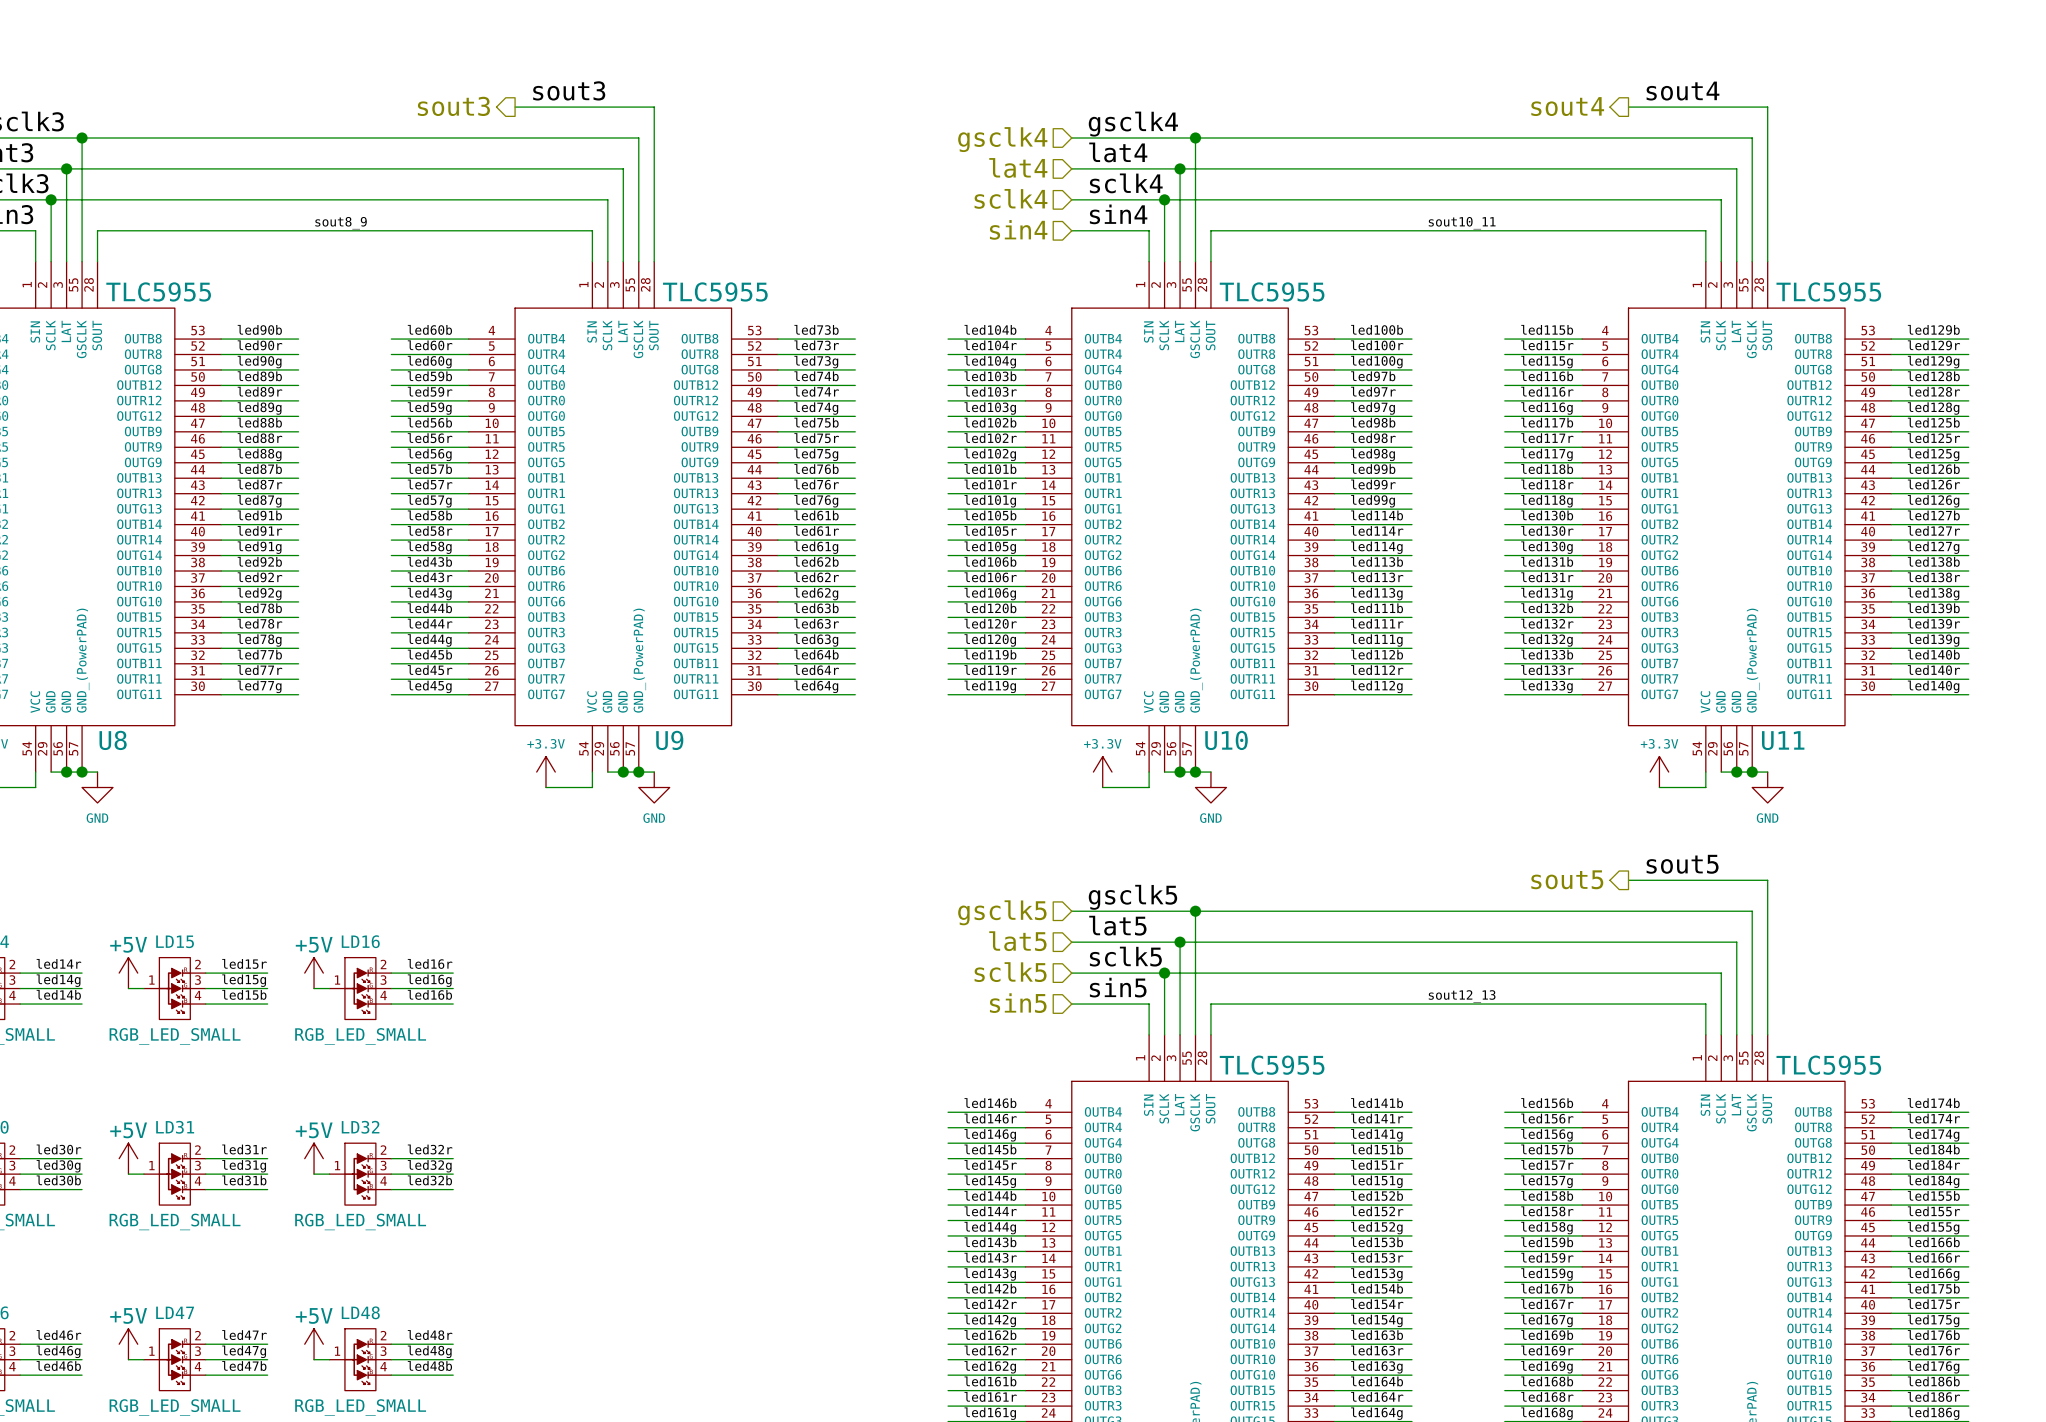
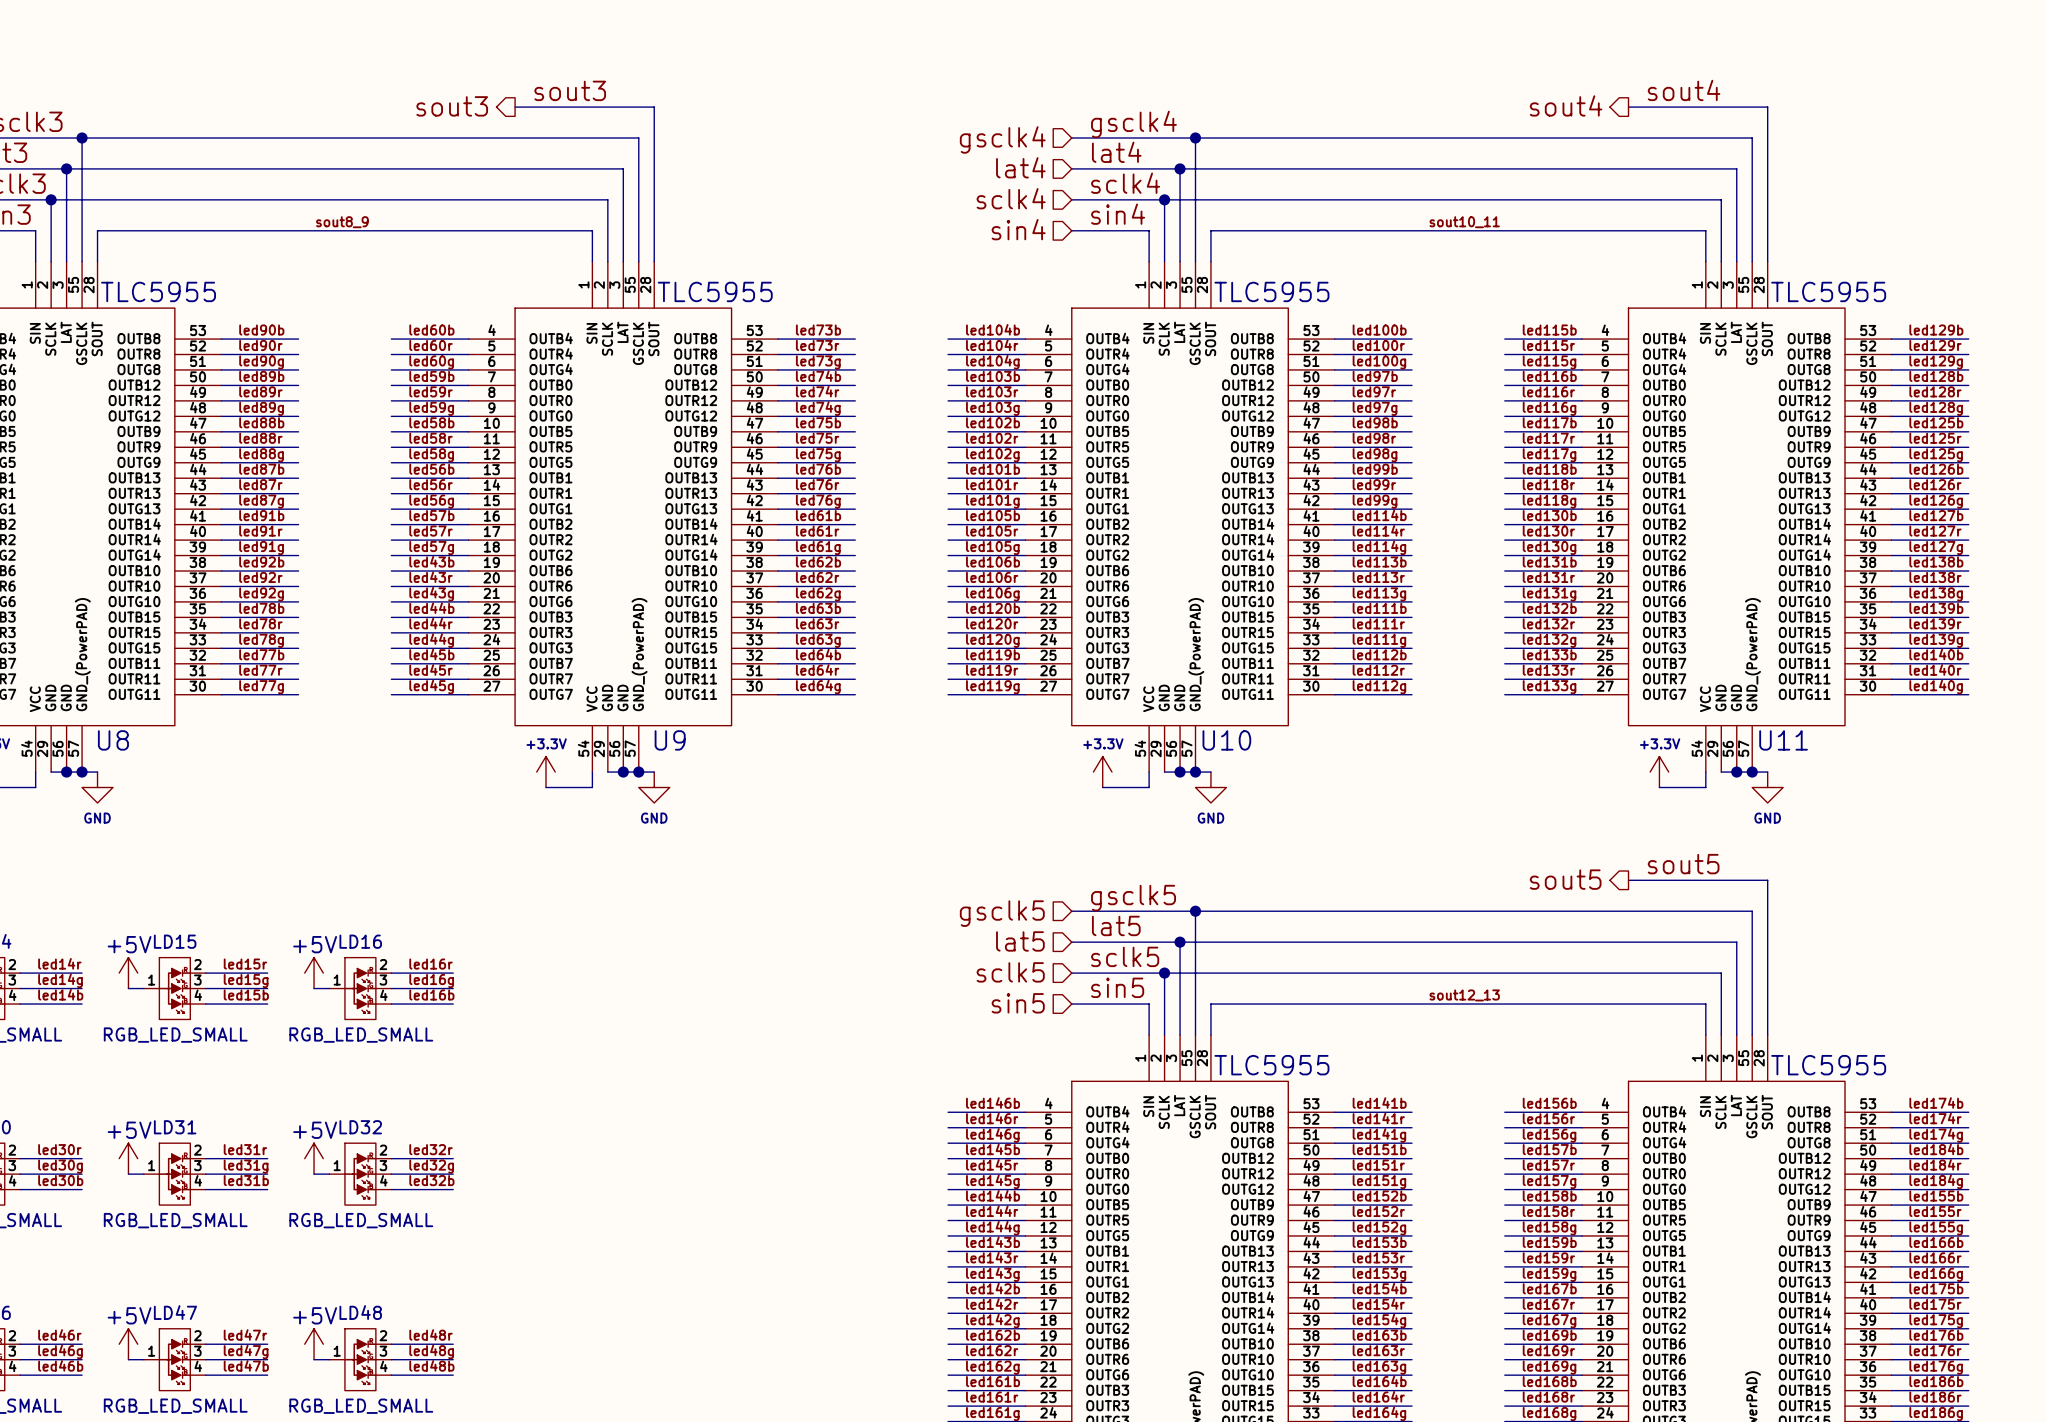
label: led56b (429, 422) -> led58b (431, 422)
label: led56r (430, 438) -> led58r (431, 438)
label: led56g (429, 454) -> led58g (431, 455)
label: led57b (429, 469) -> led56b (431, 469)
label: led57r (430, 484) -> led56r (431, 484)
label: led57g (429, 501) -> led56g (431, 501)
label: led58b (429, 515) -> led57b (431, 515)
label: led58r (430, 530) -> led57r (431, 531)
label: led58g (429, 547) -> led57g (431, 548)

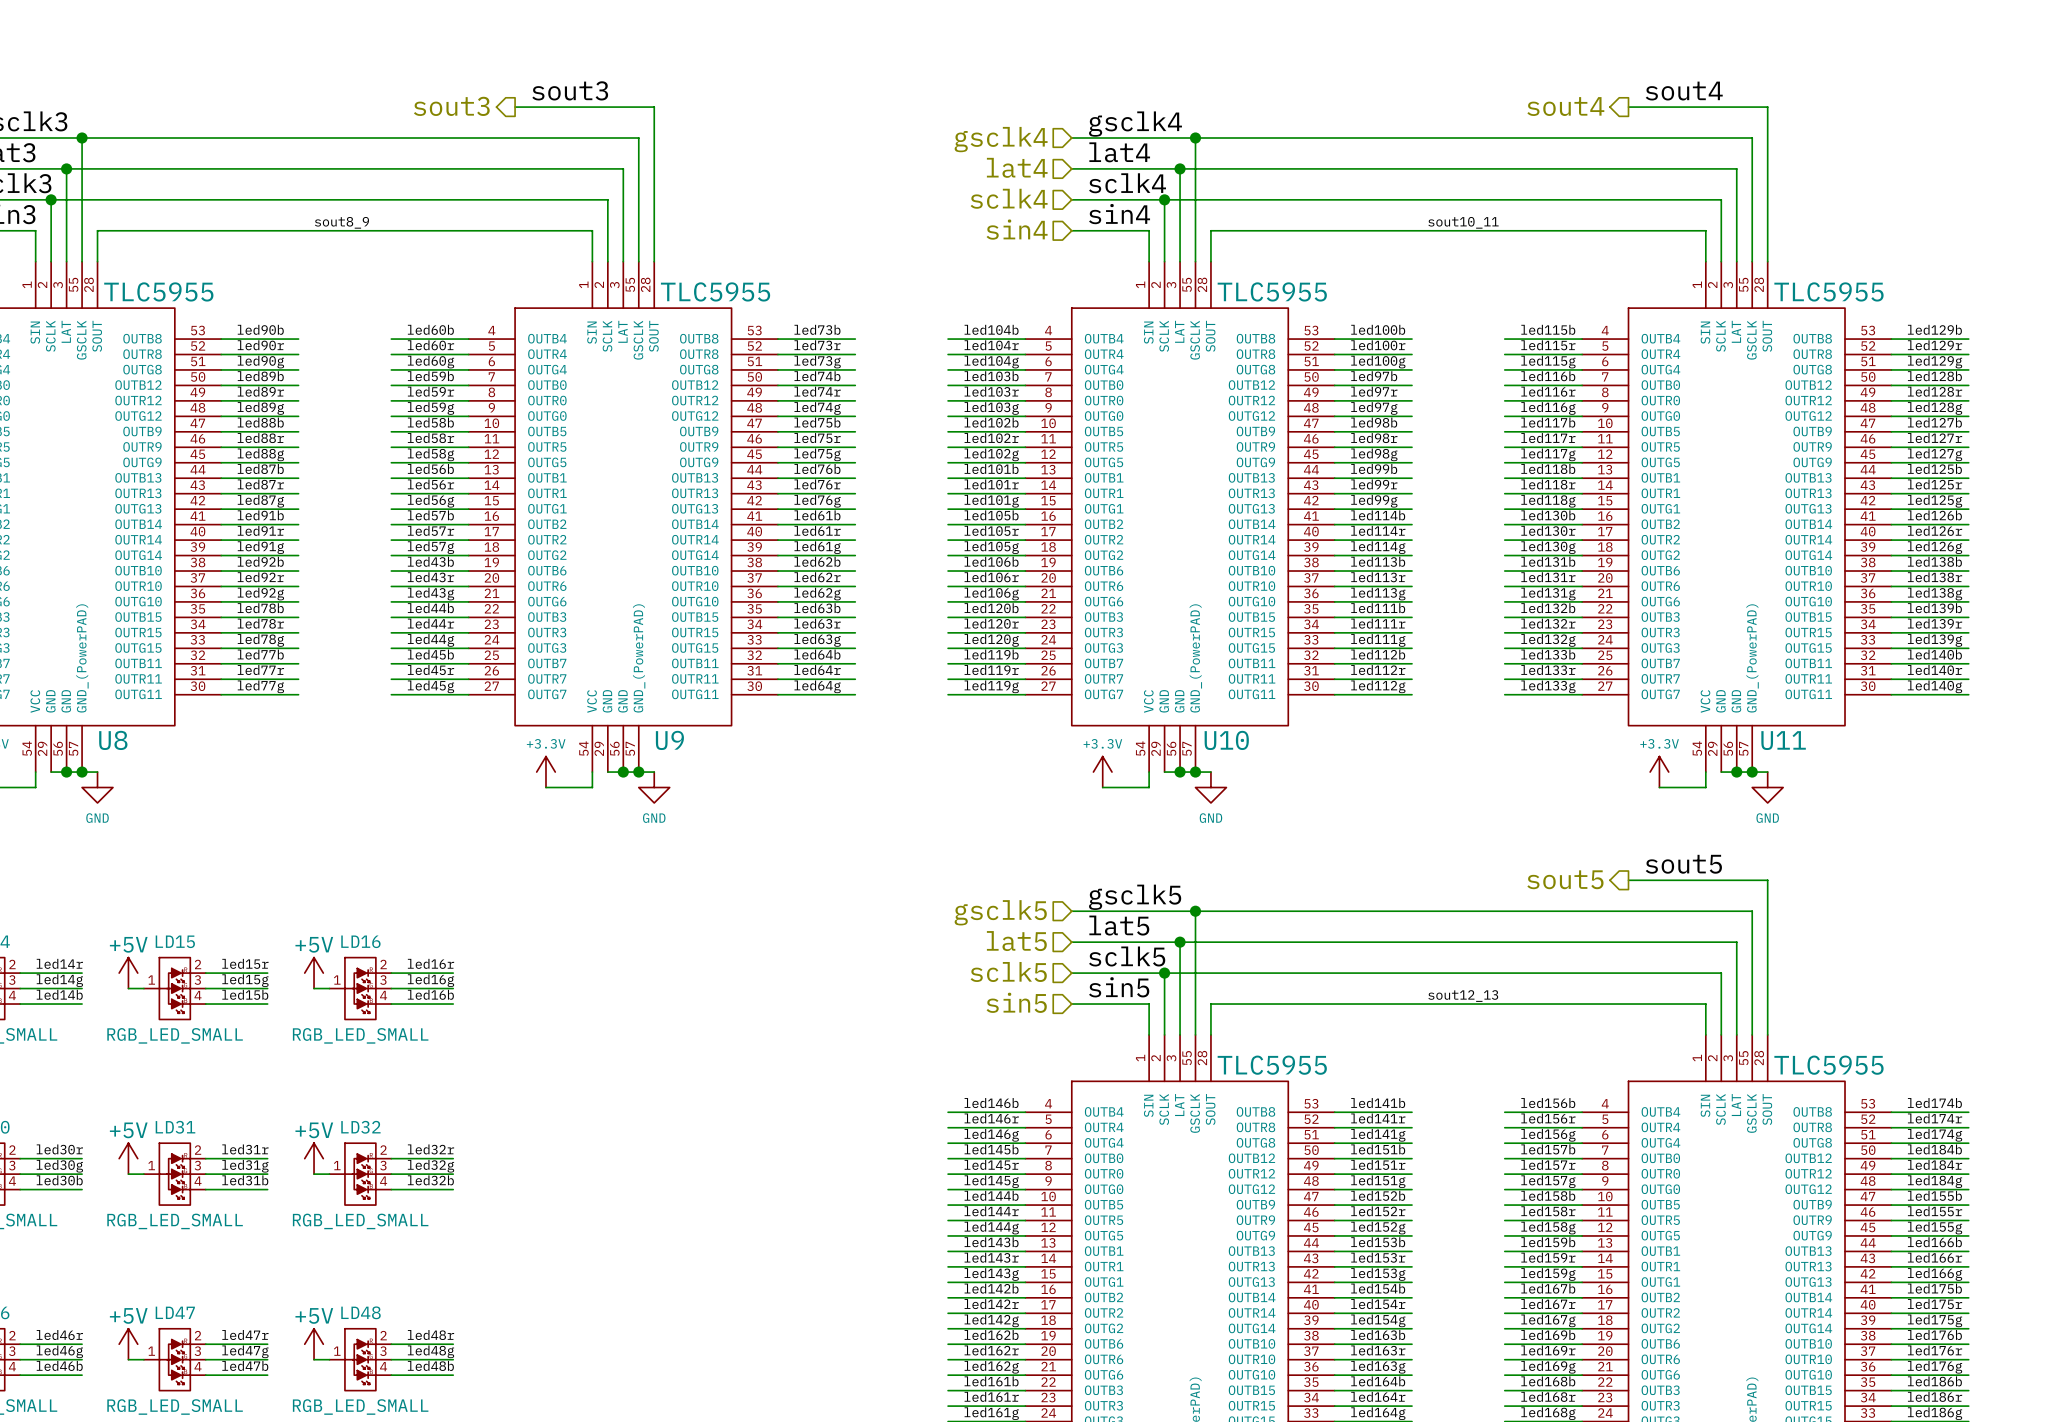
label: led125b (1936, 422) -> led127b (1934, 422)
label: led125r (1935, 438) -> led127r (1935, 438)
label: led125g (1936, 455) -> led127g (1935, 454)
label: led126b (1936, 469) -> led125b (1934, 468)
label: led126r (1935, 484) -> led125r (1935, 484)
label: led126g (1936, 501) -> led125g (1935, 501)
label: led127b (1936, 515) -> led126b (1934, 515)
label: led127r (1935, 531) -> led126r (1935, 530)
label: led127g (1936, 548) -> led126g (1935, 547)

